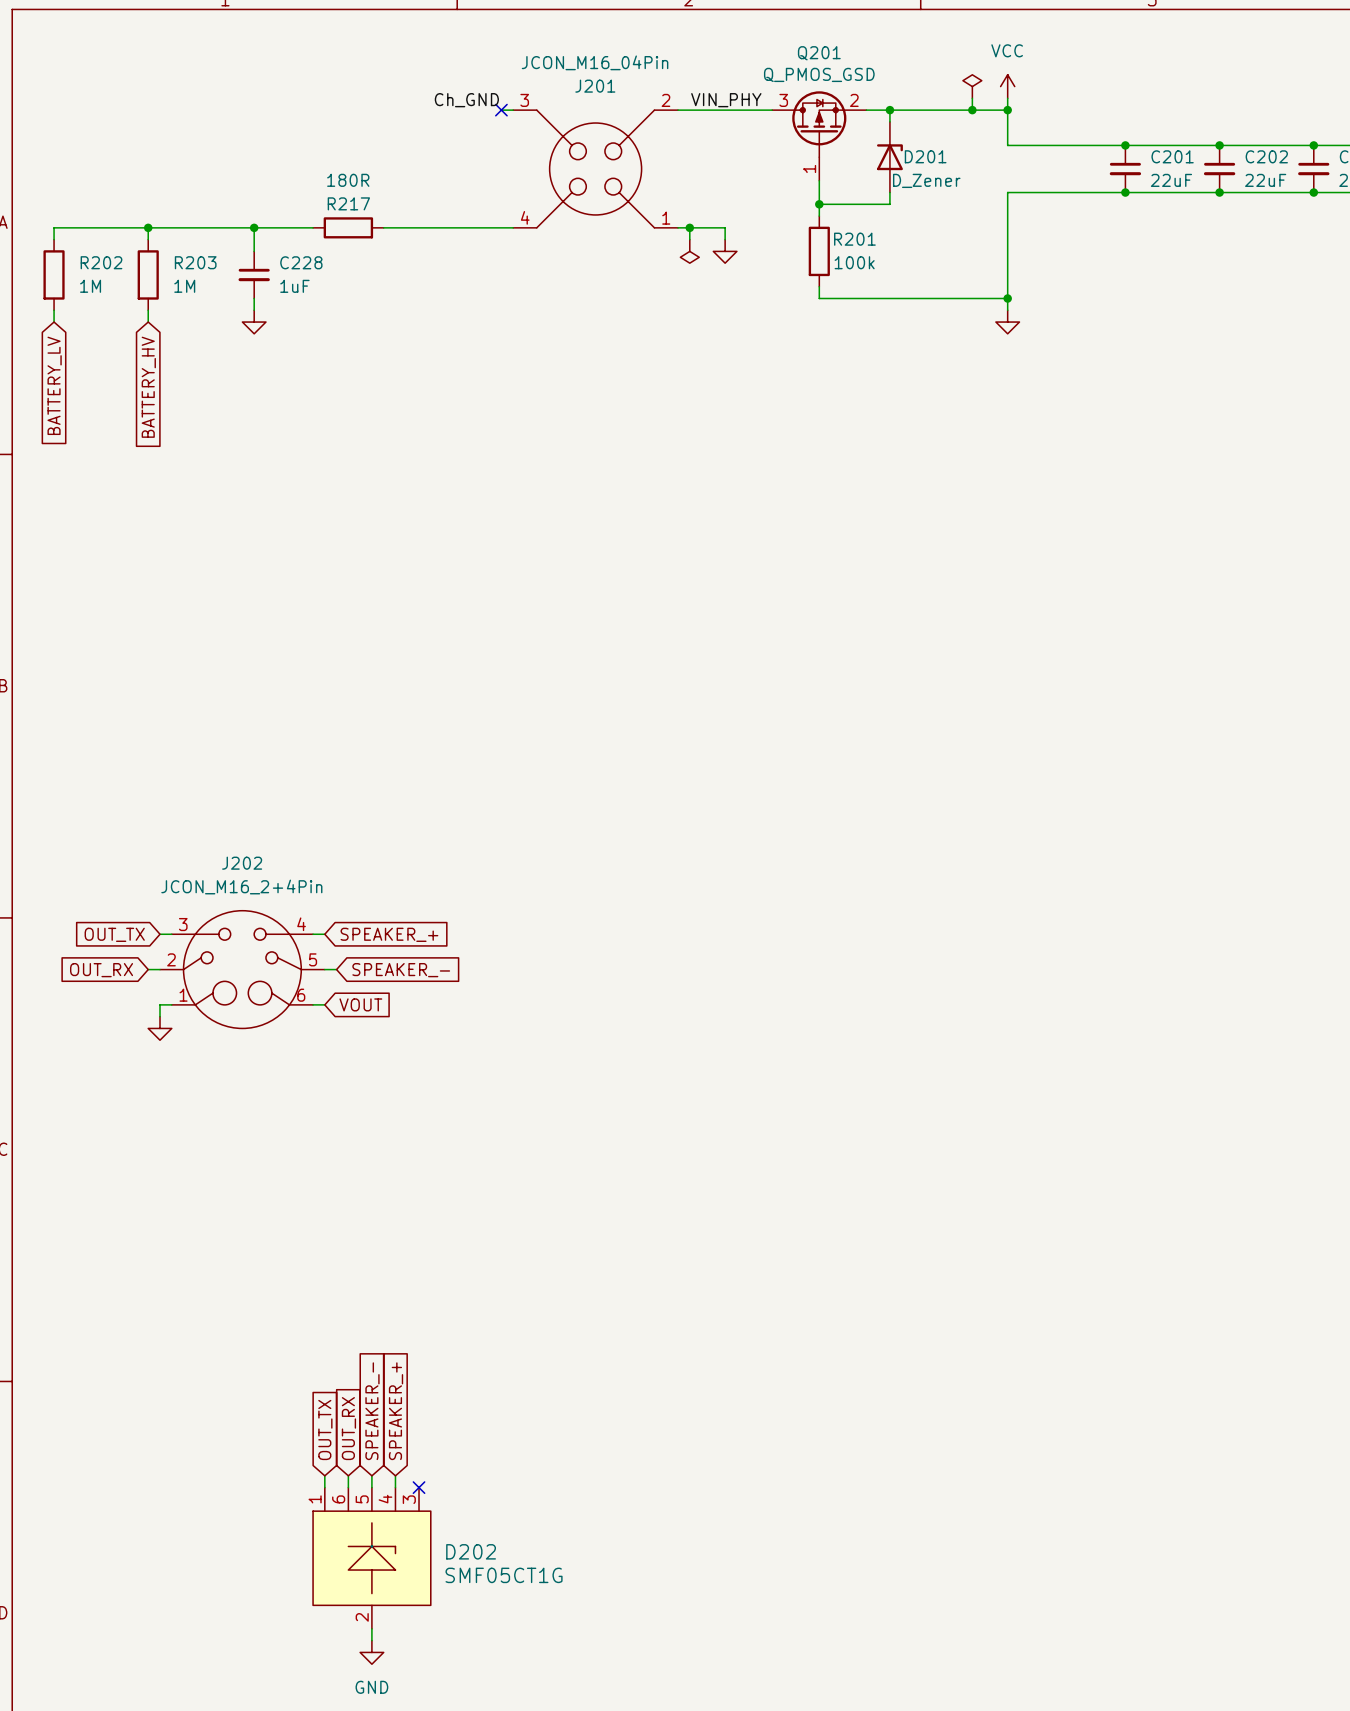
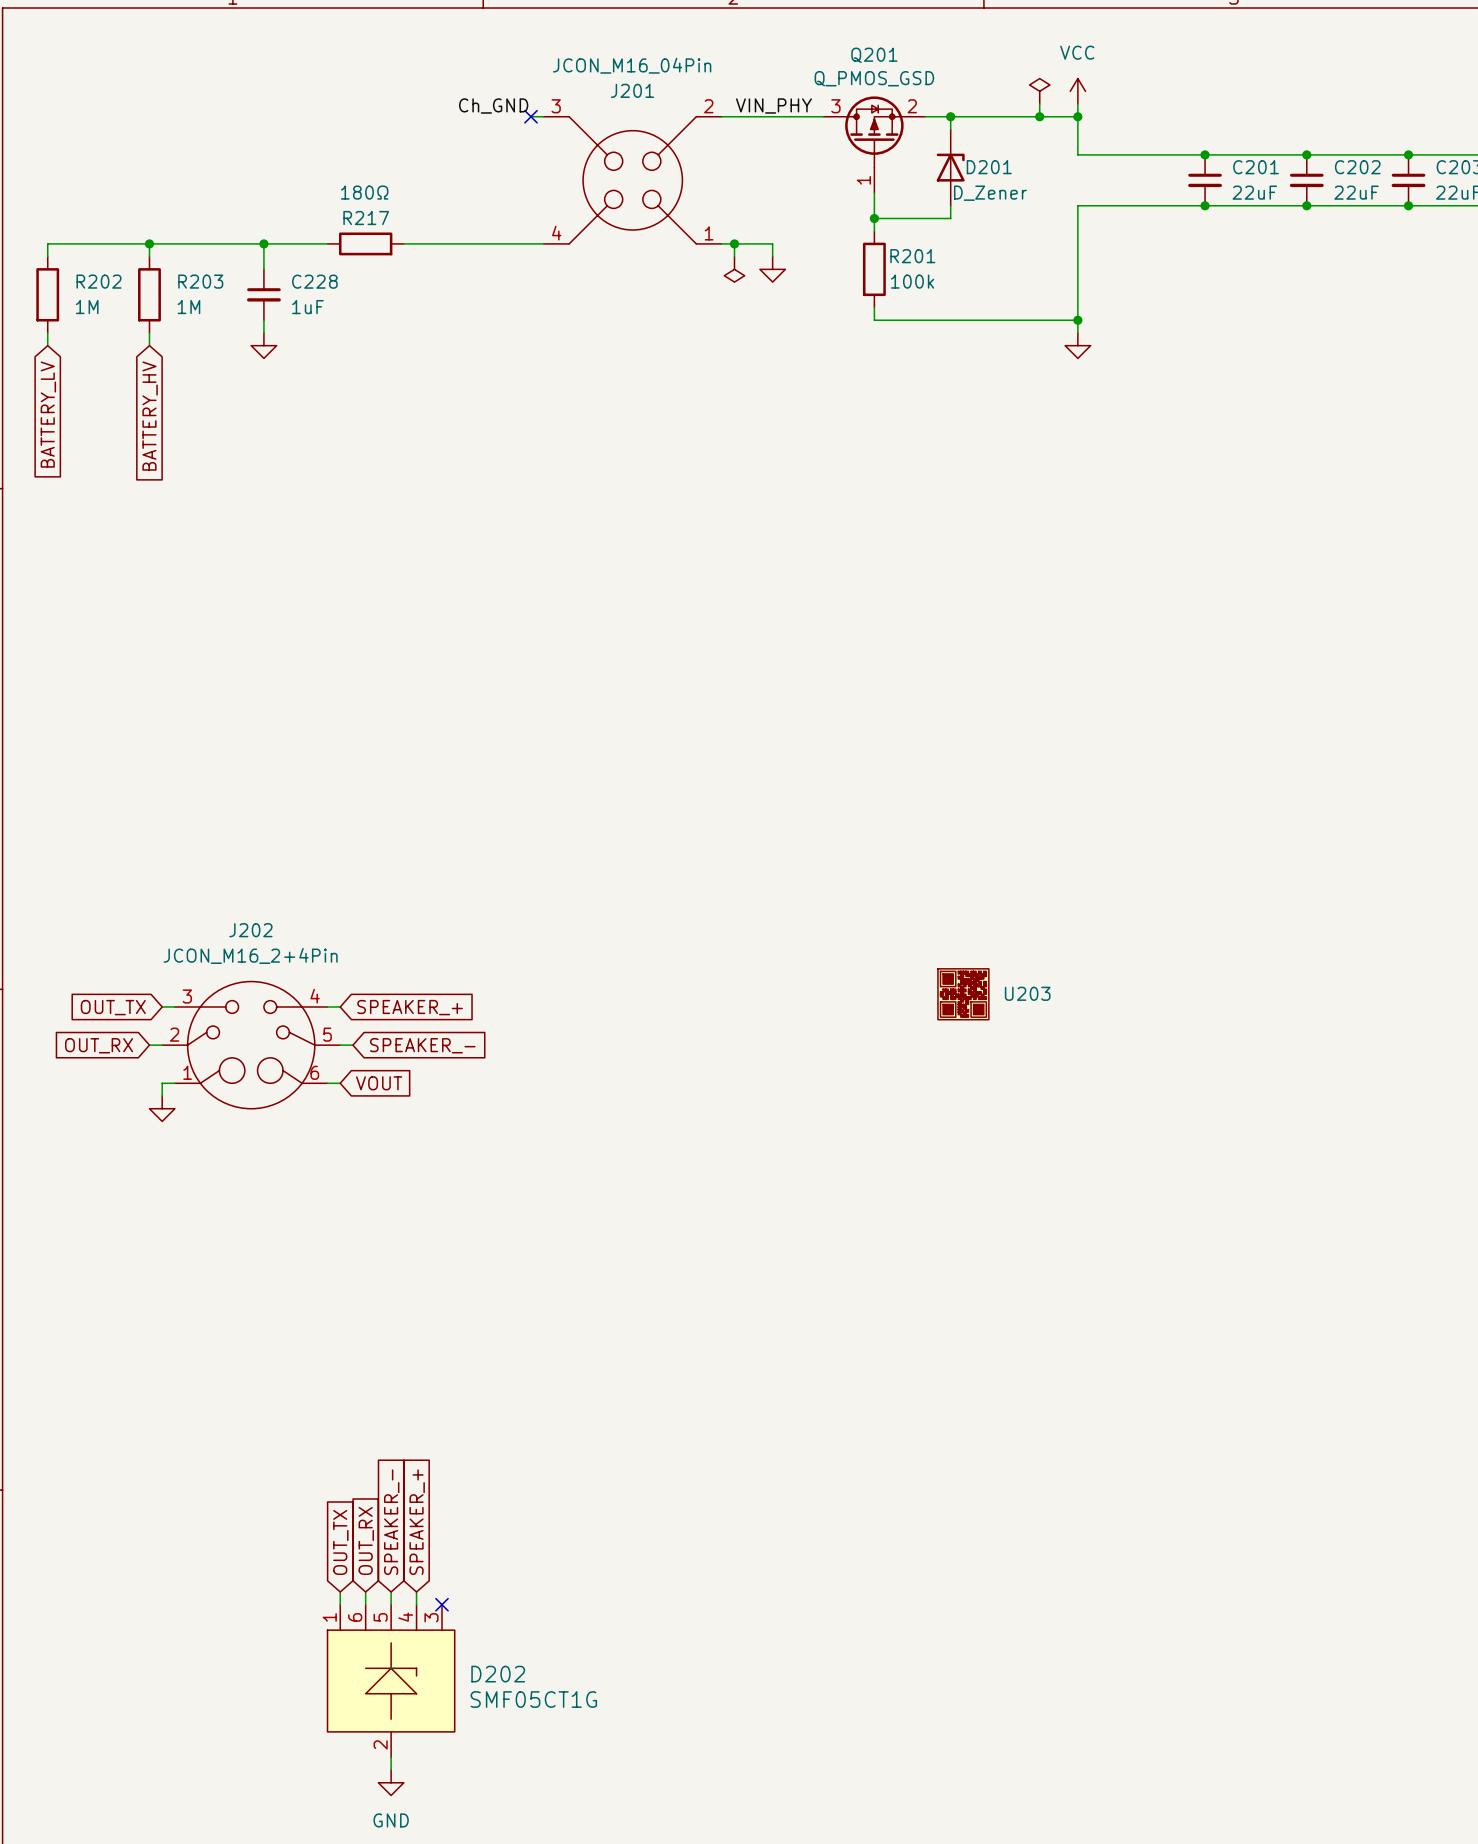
R217 value: 180R (348, 180) -> 180Ω (364, 192)
U203: none -> (963, 994)

